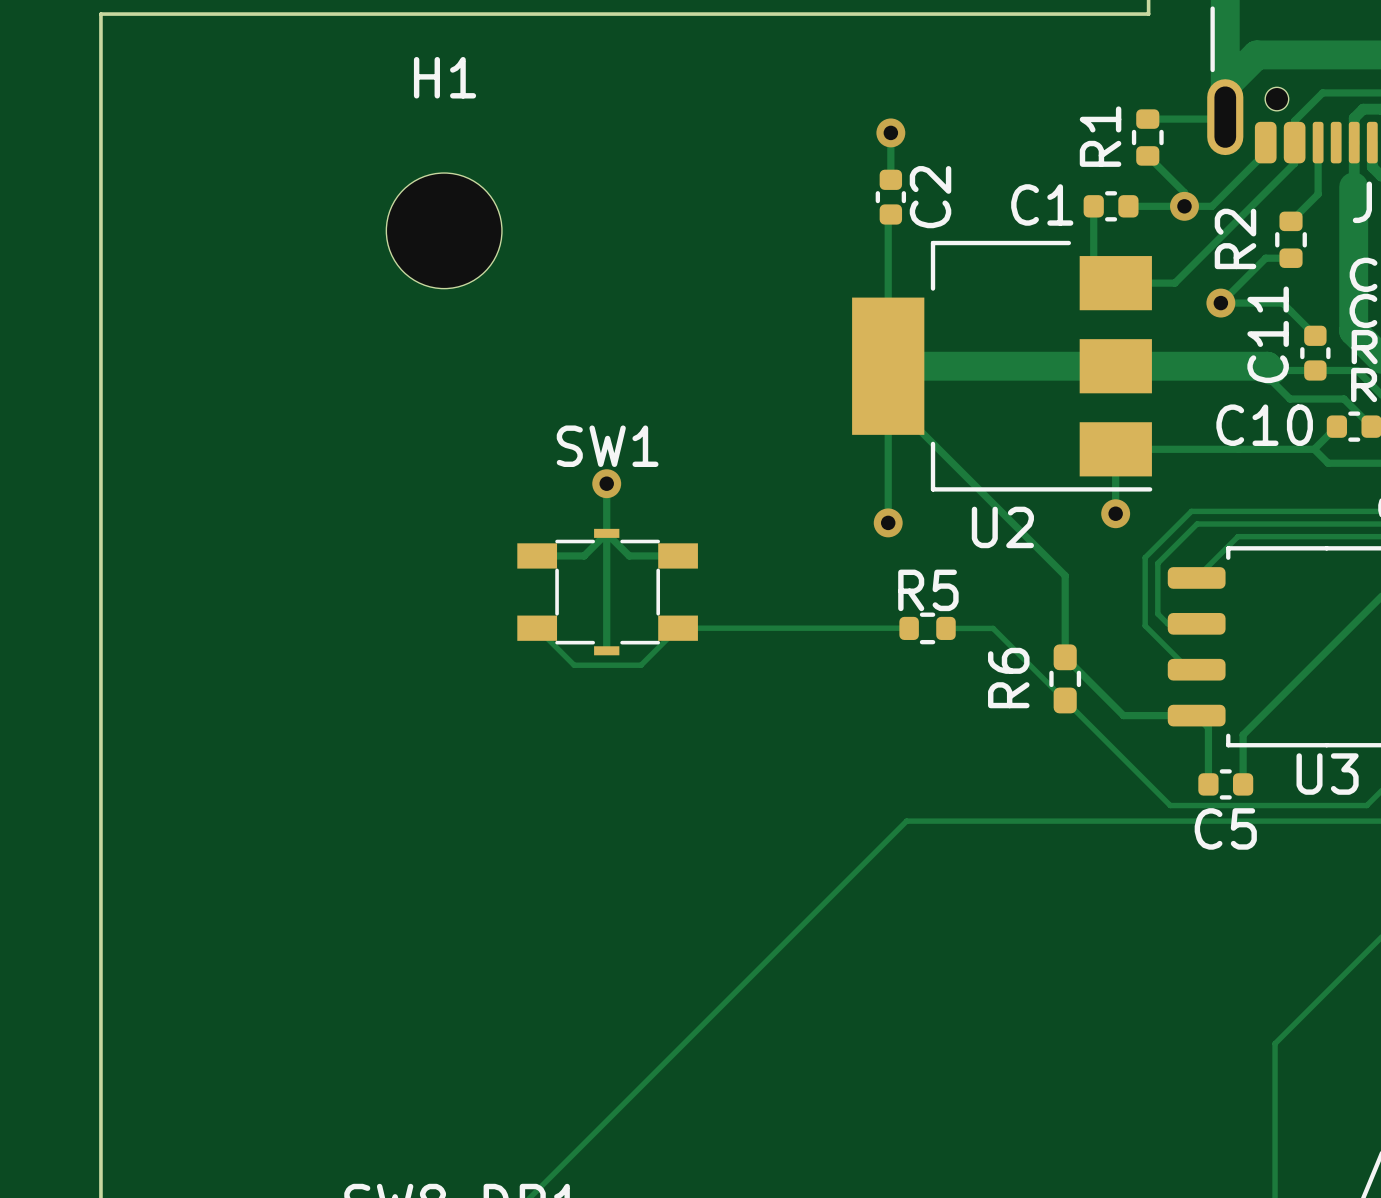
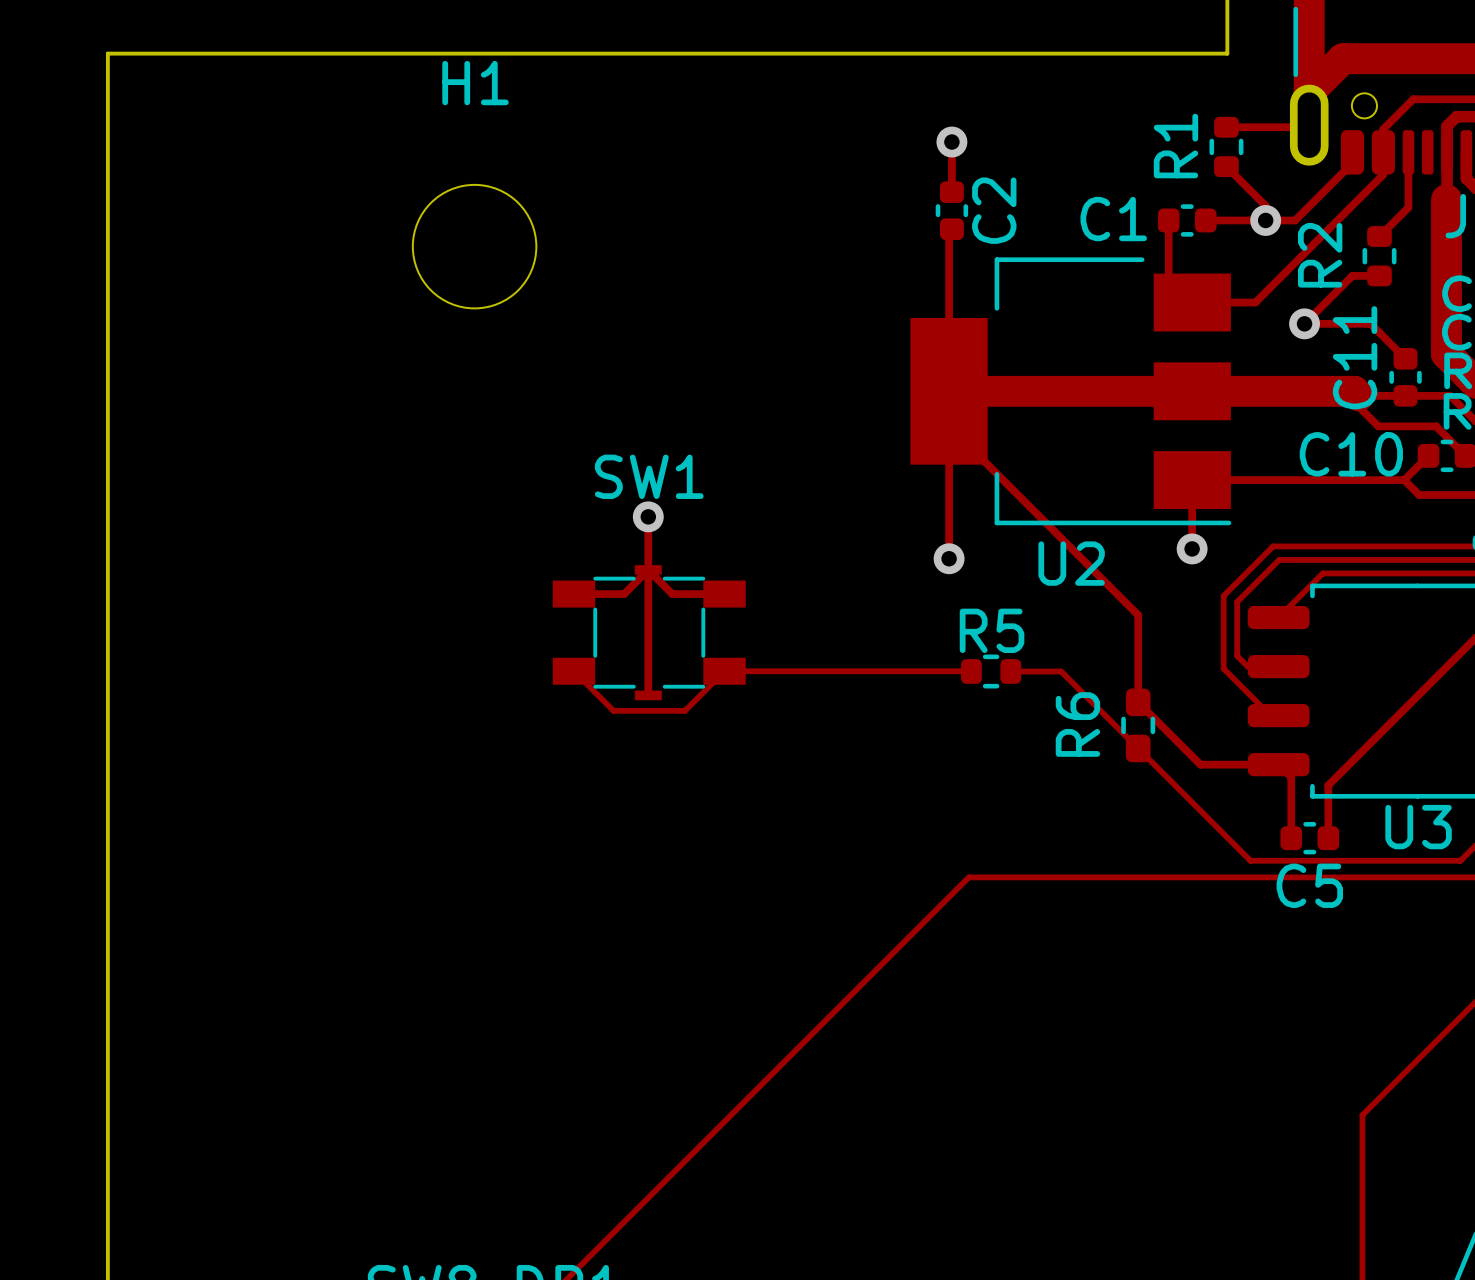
board edge: (1148, 14) (100, 14) (100, 50) -> (1227, 15) (1227, 53) (107, 53)

